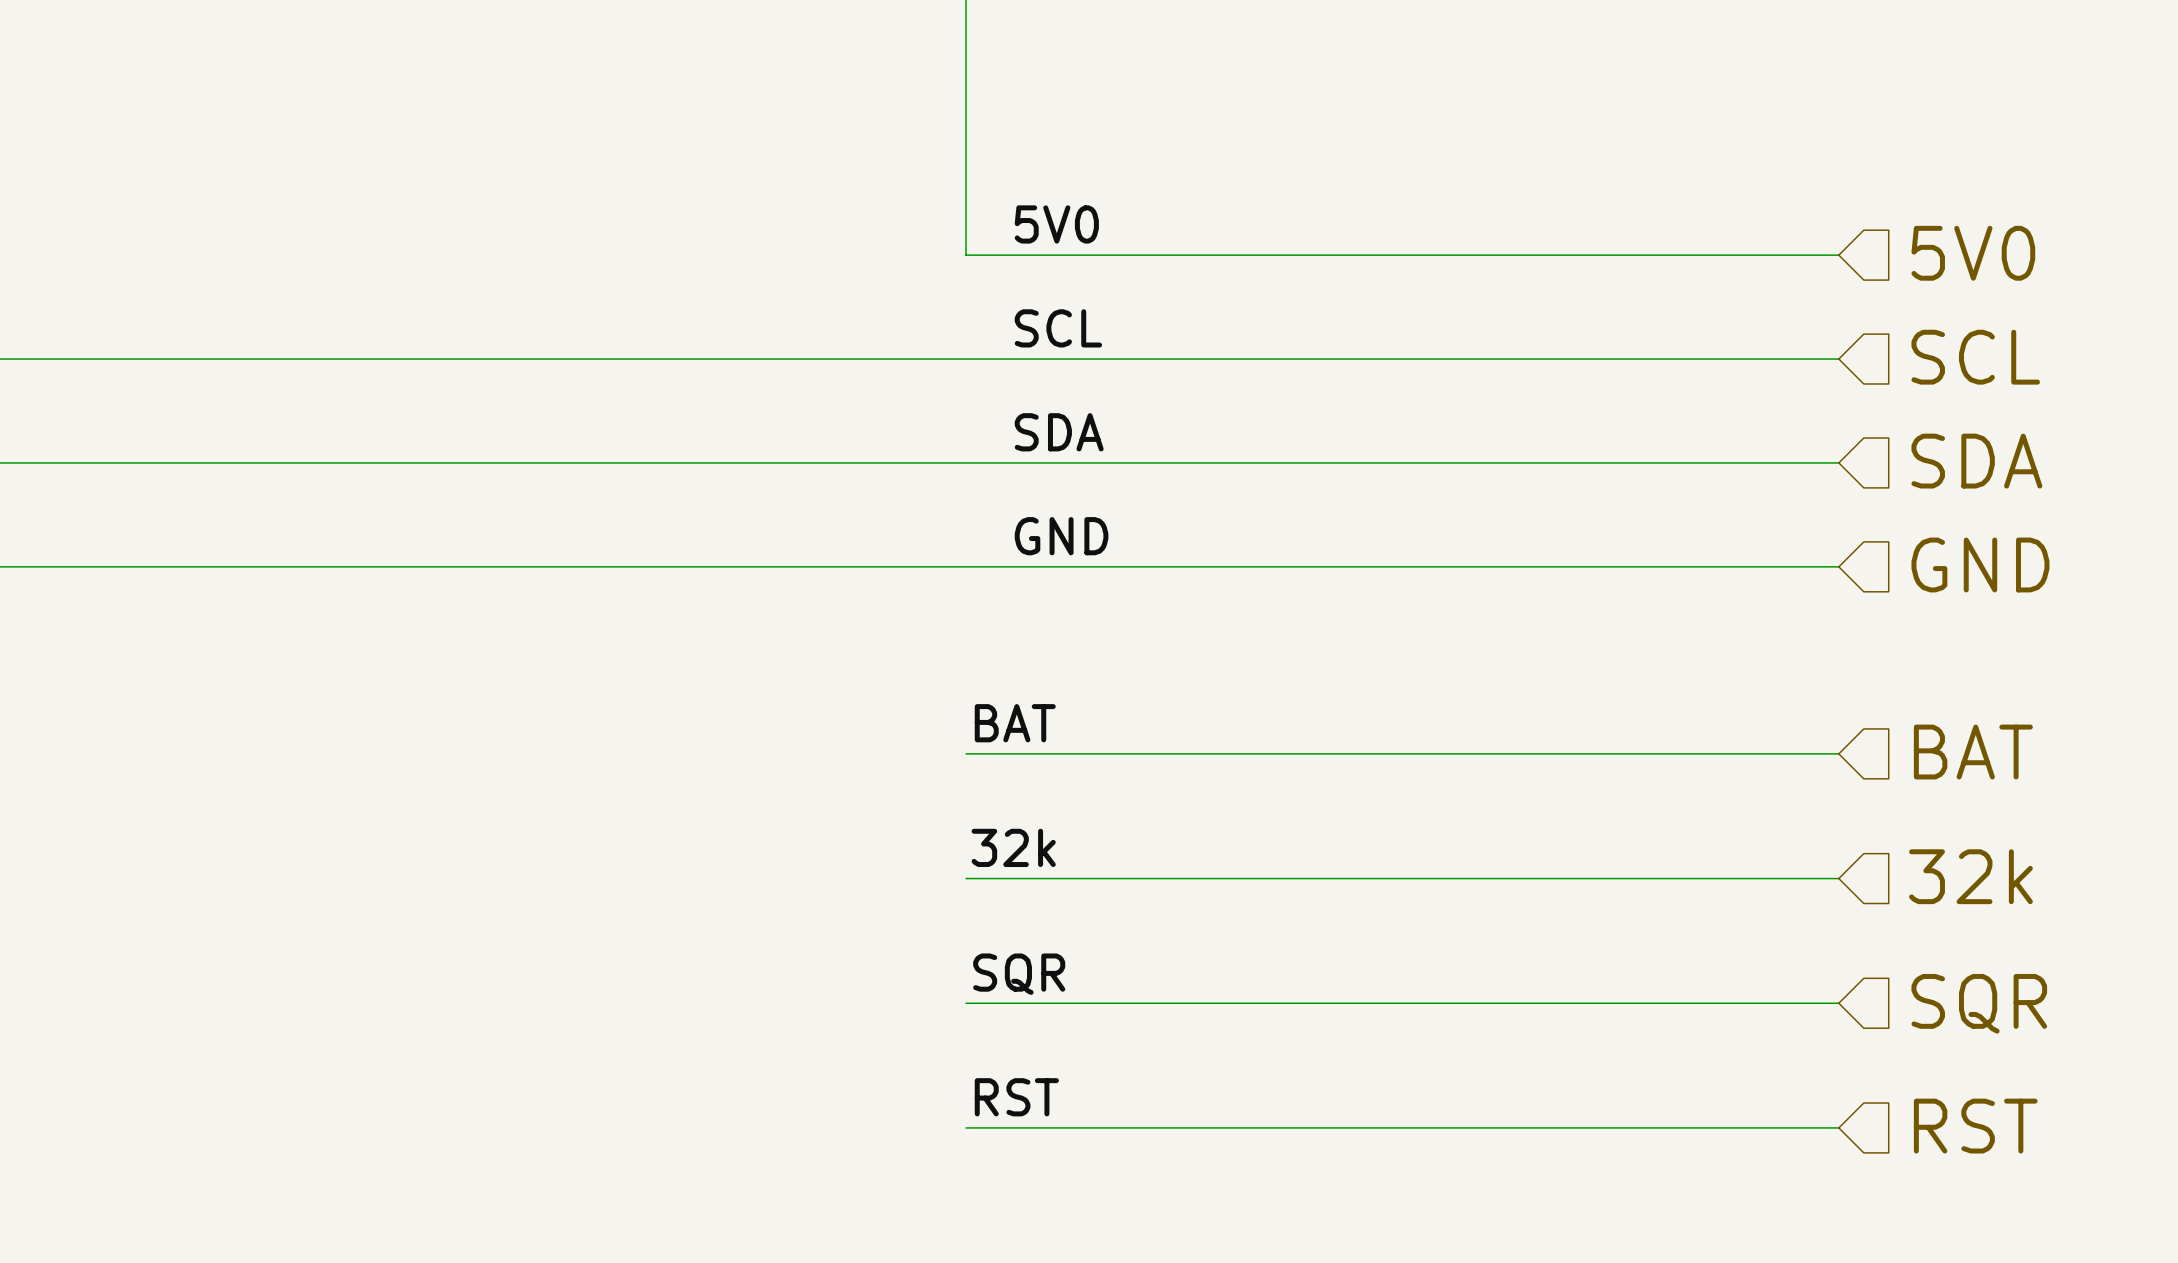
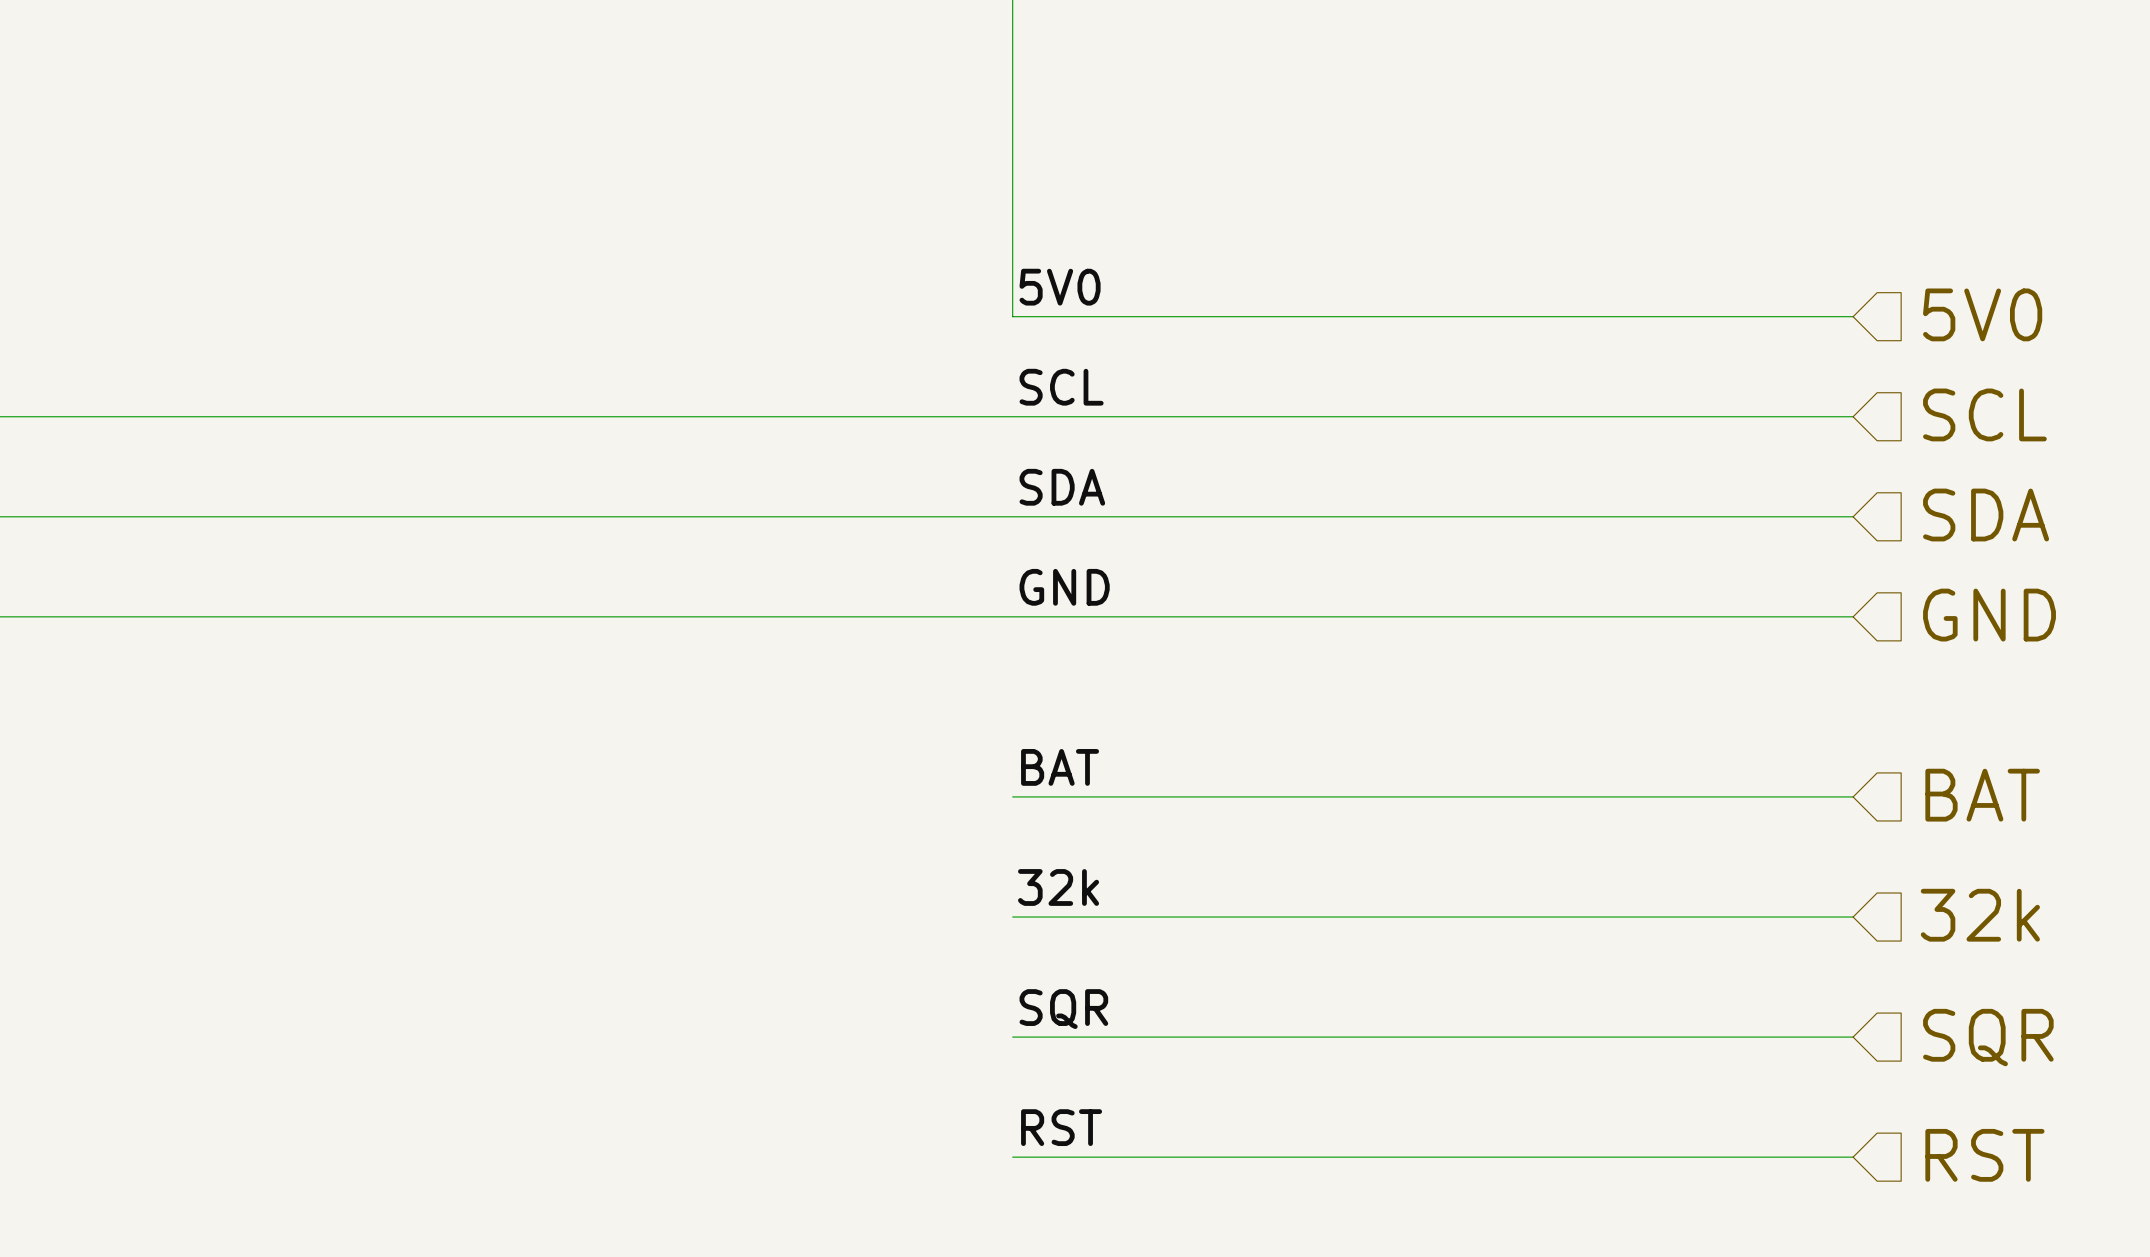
label position: 5V0 (1056, 224) -> 5V0 (1060, 287)
label position: SCL (1058, 328) -> SCL (1061, 387)
label position: SDA (1059, 432) -> SDA (1062, 487)
label position: GND (1061, 536) -> GND (1064, 587)

